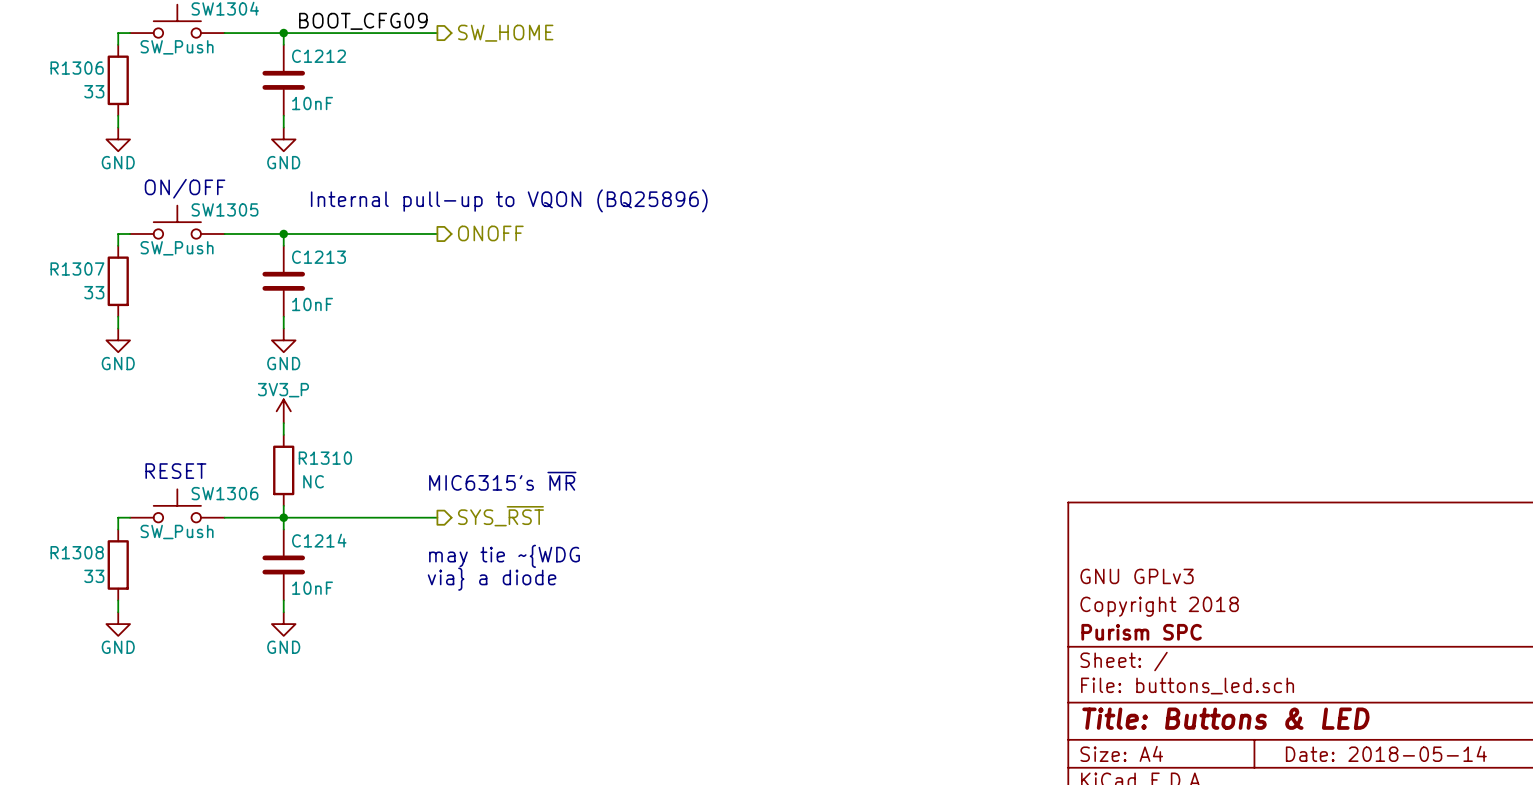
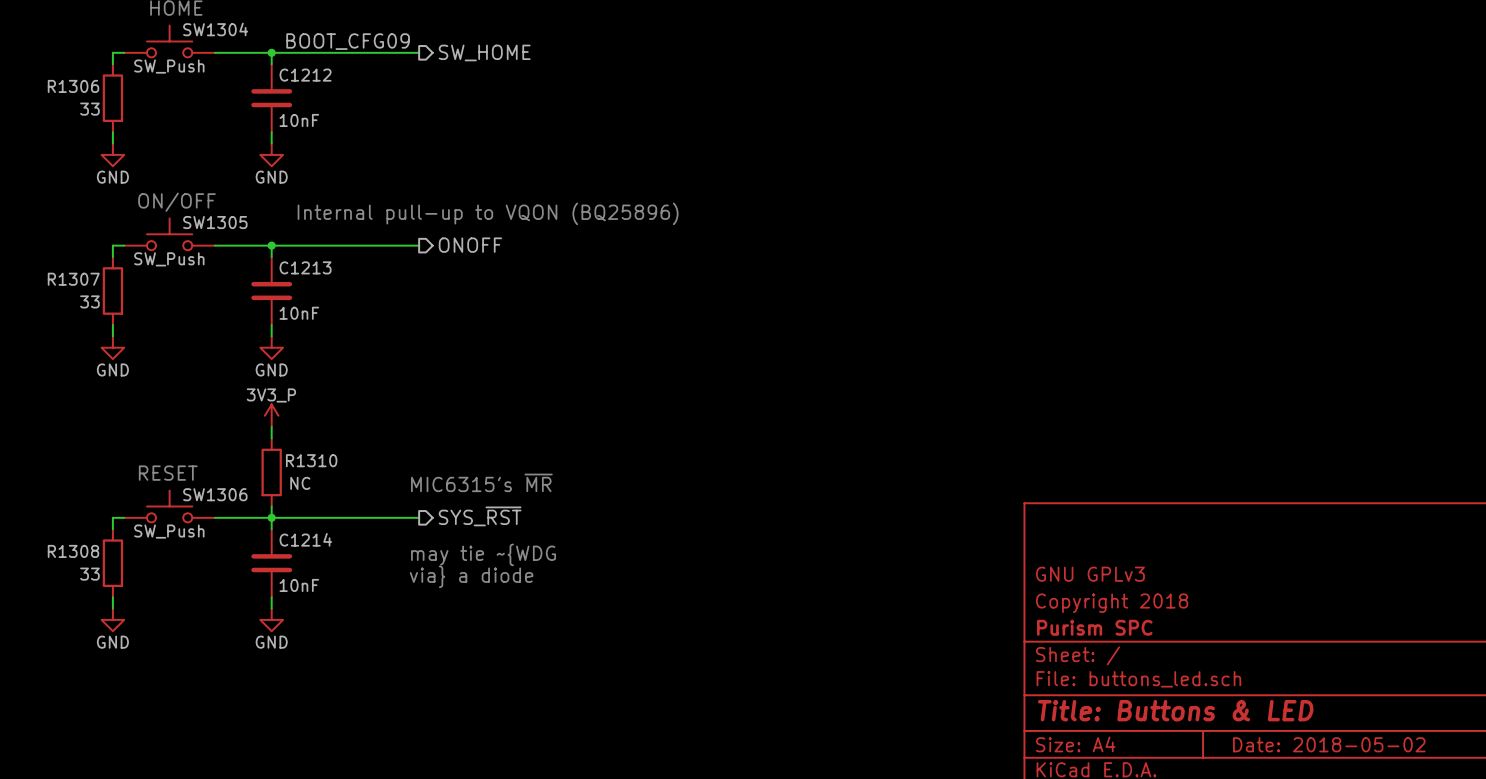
title block: Date: 2018-05-14 (1386, 753) -> Date: 2018-05-02 (1329, 744)

